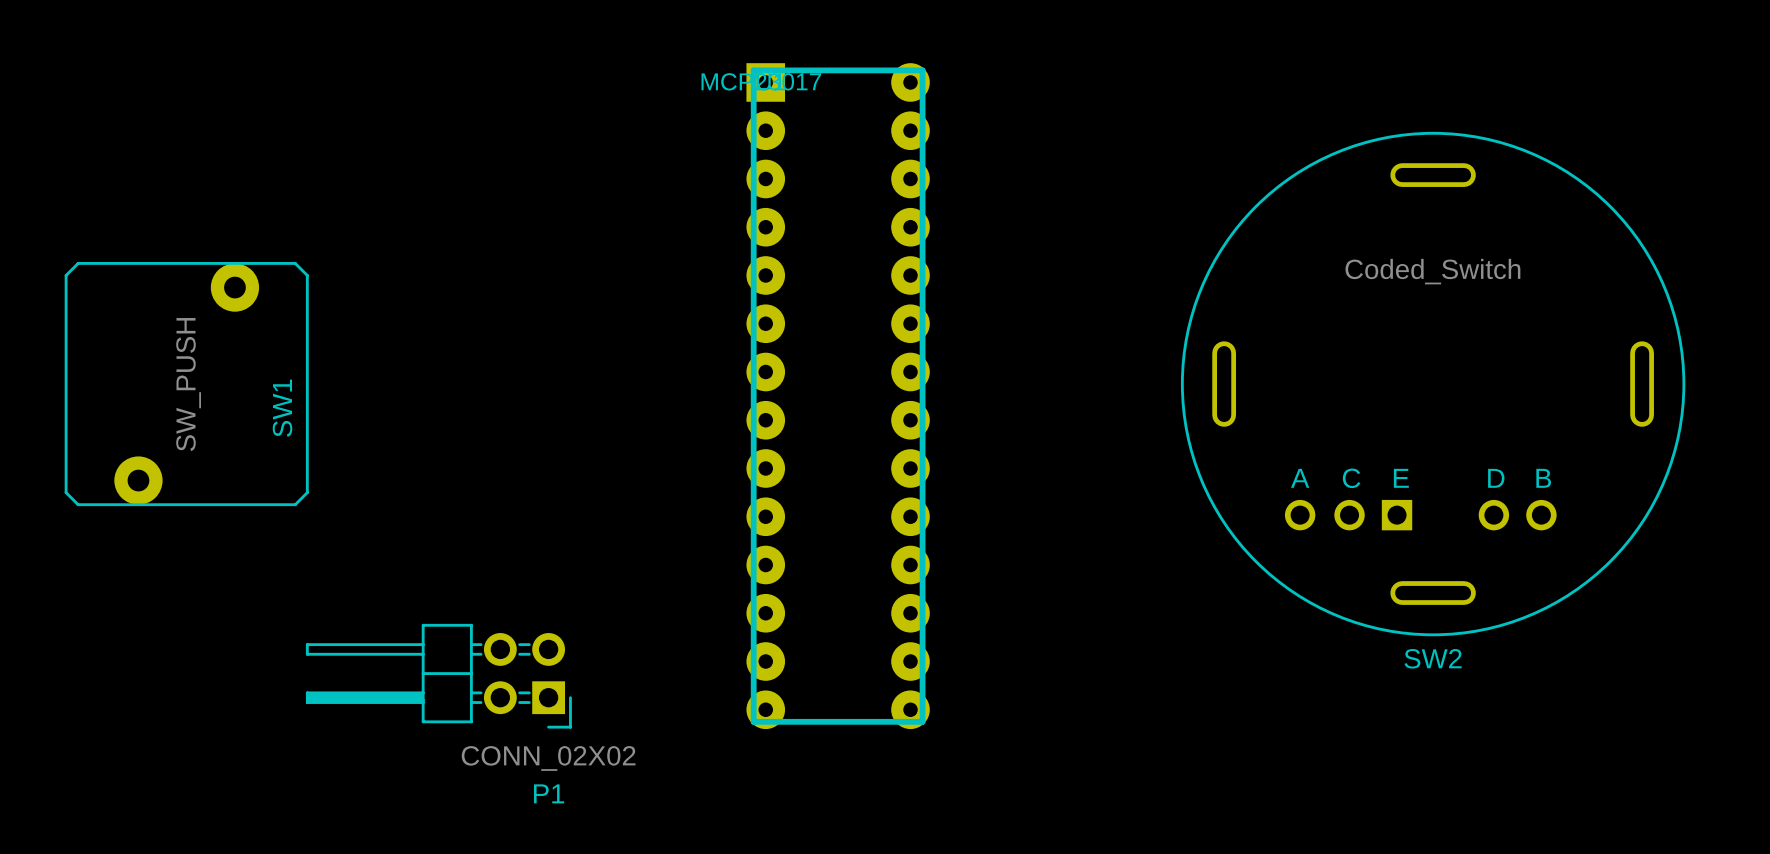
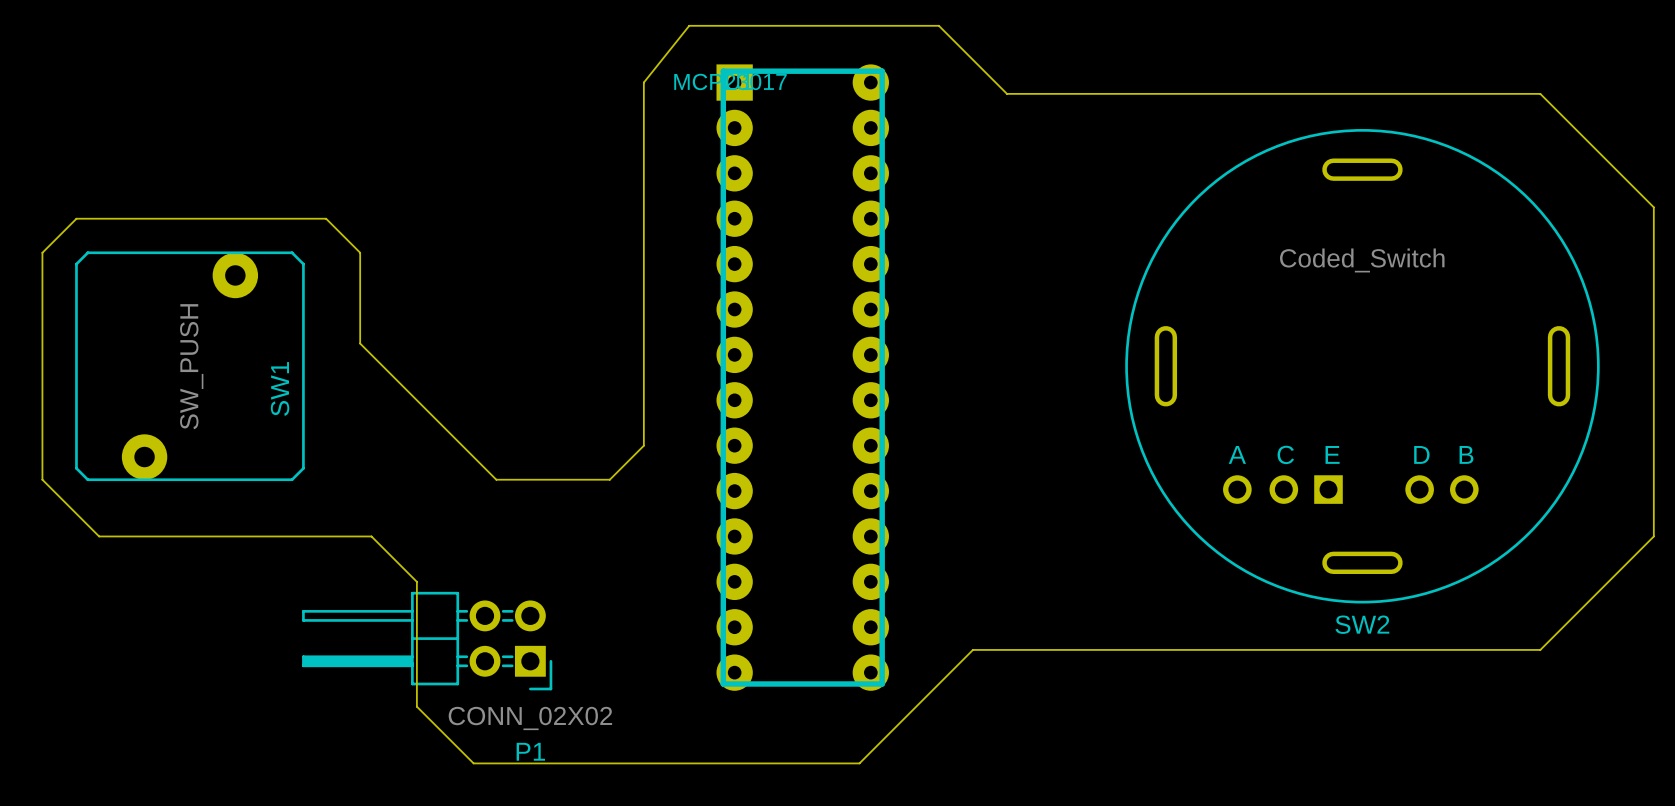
board edge: none -> (689, 25) (938, 25) (1007, 93) (1540, 93) (1653, 207) (1653, 536) (1540, 649) (972, 649) (859, 763) (473, 763) (416, 706) (416, 581) (371, 536) (99, 536) (42, 479) (42, 252) (76, 218) (326, 218) (360, 252) (360, 343) (496, 479) (609, 479) (643, 445) (643, 82) (689, 25)

